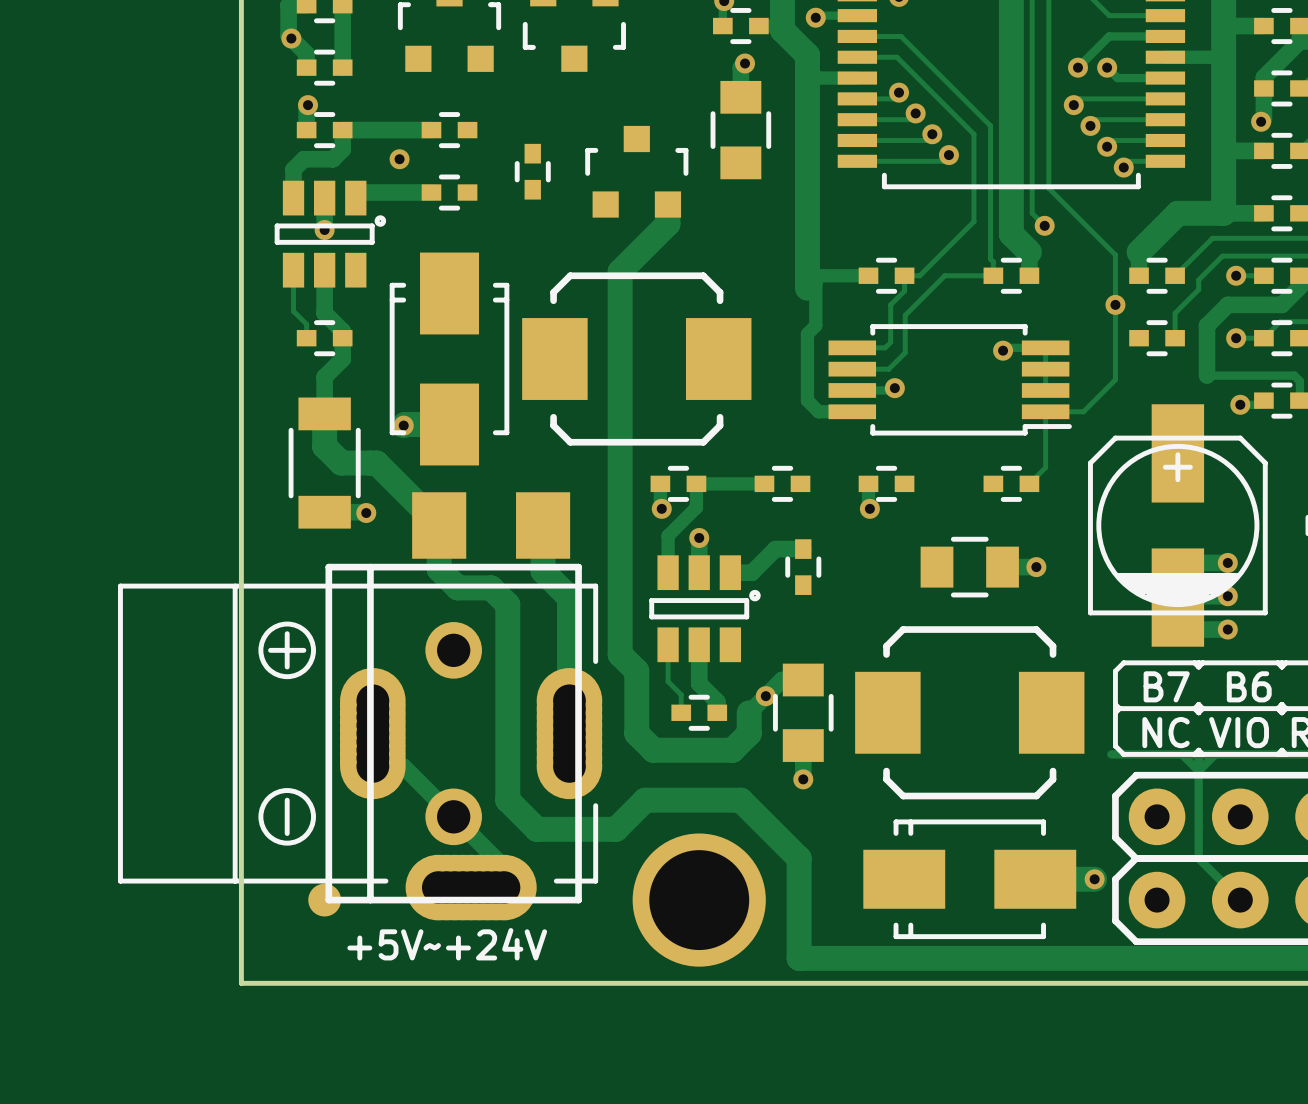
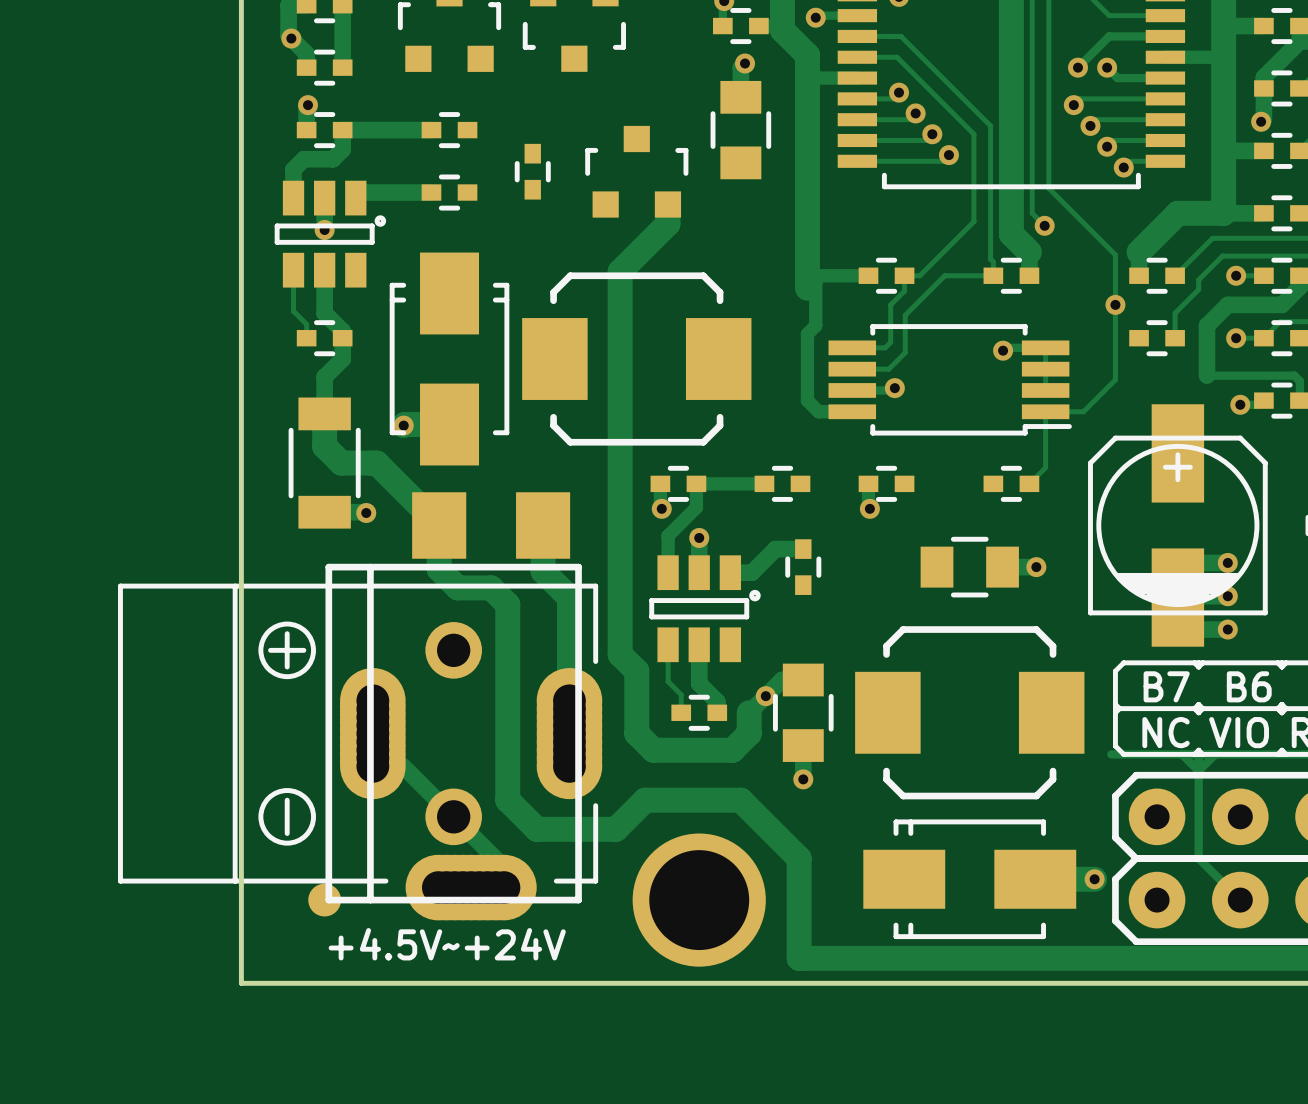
via: (399, 159) -> none
text: +5V~+24V (447, 944) -> +4.5V~+24V (447, 944)

